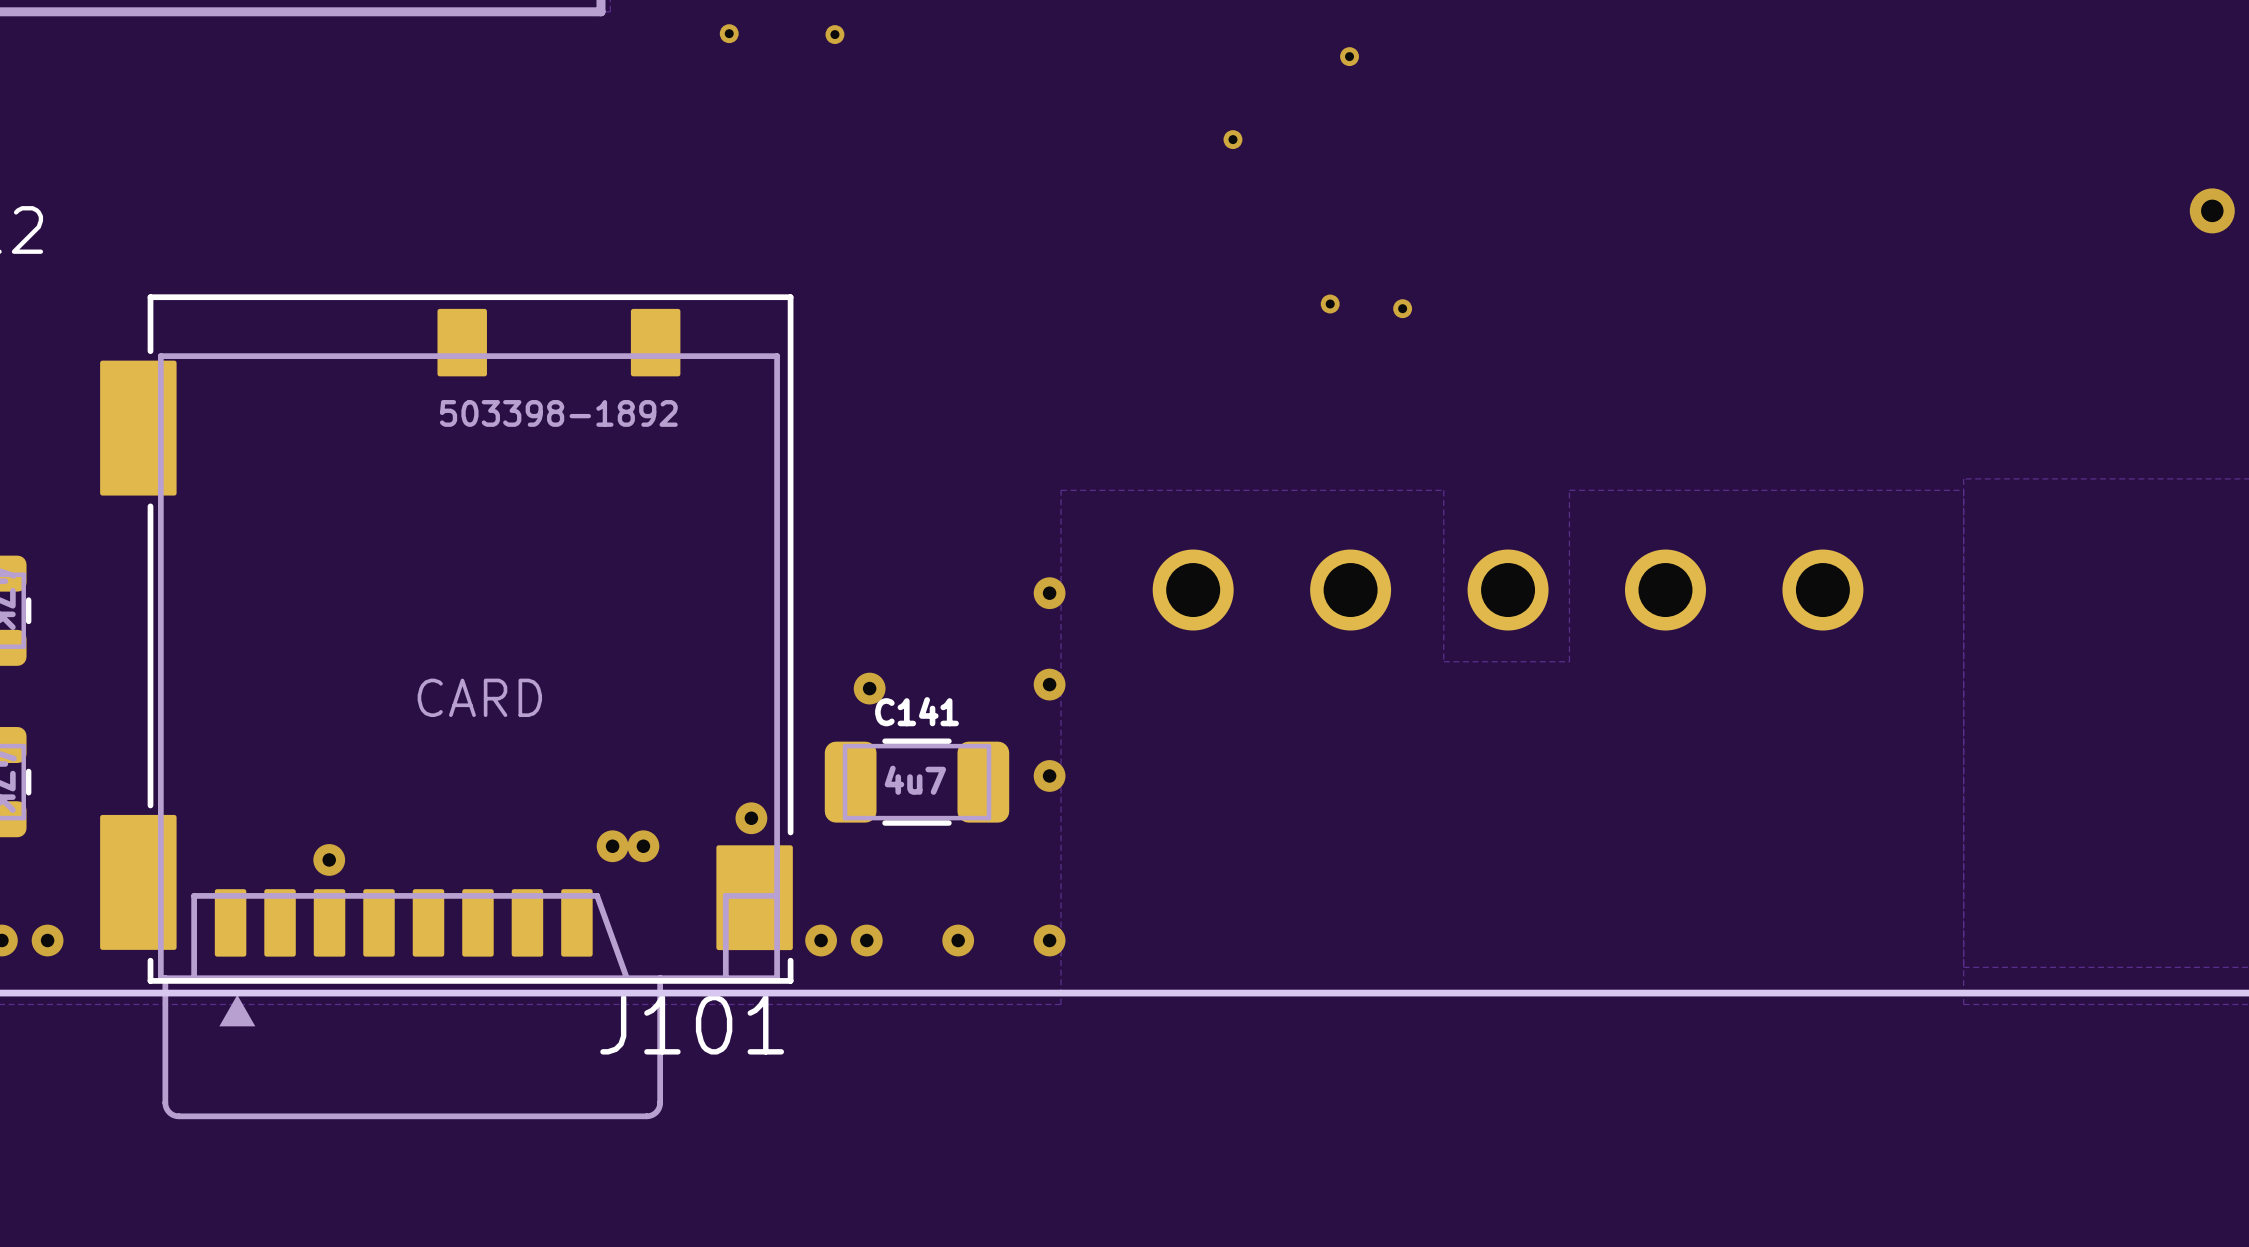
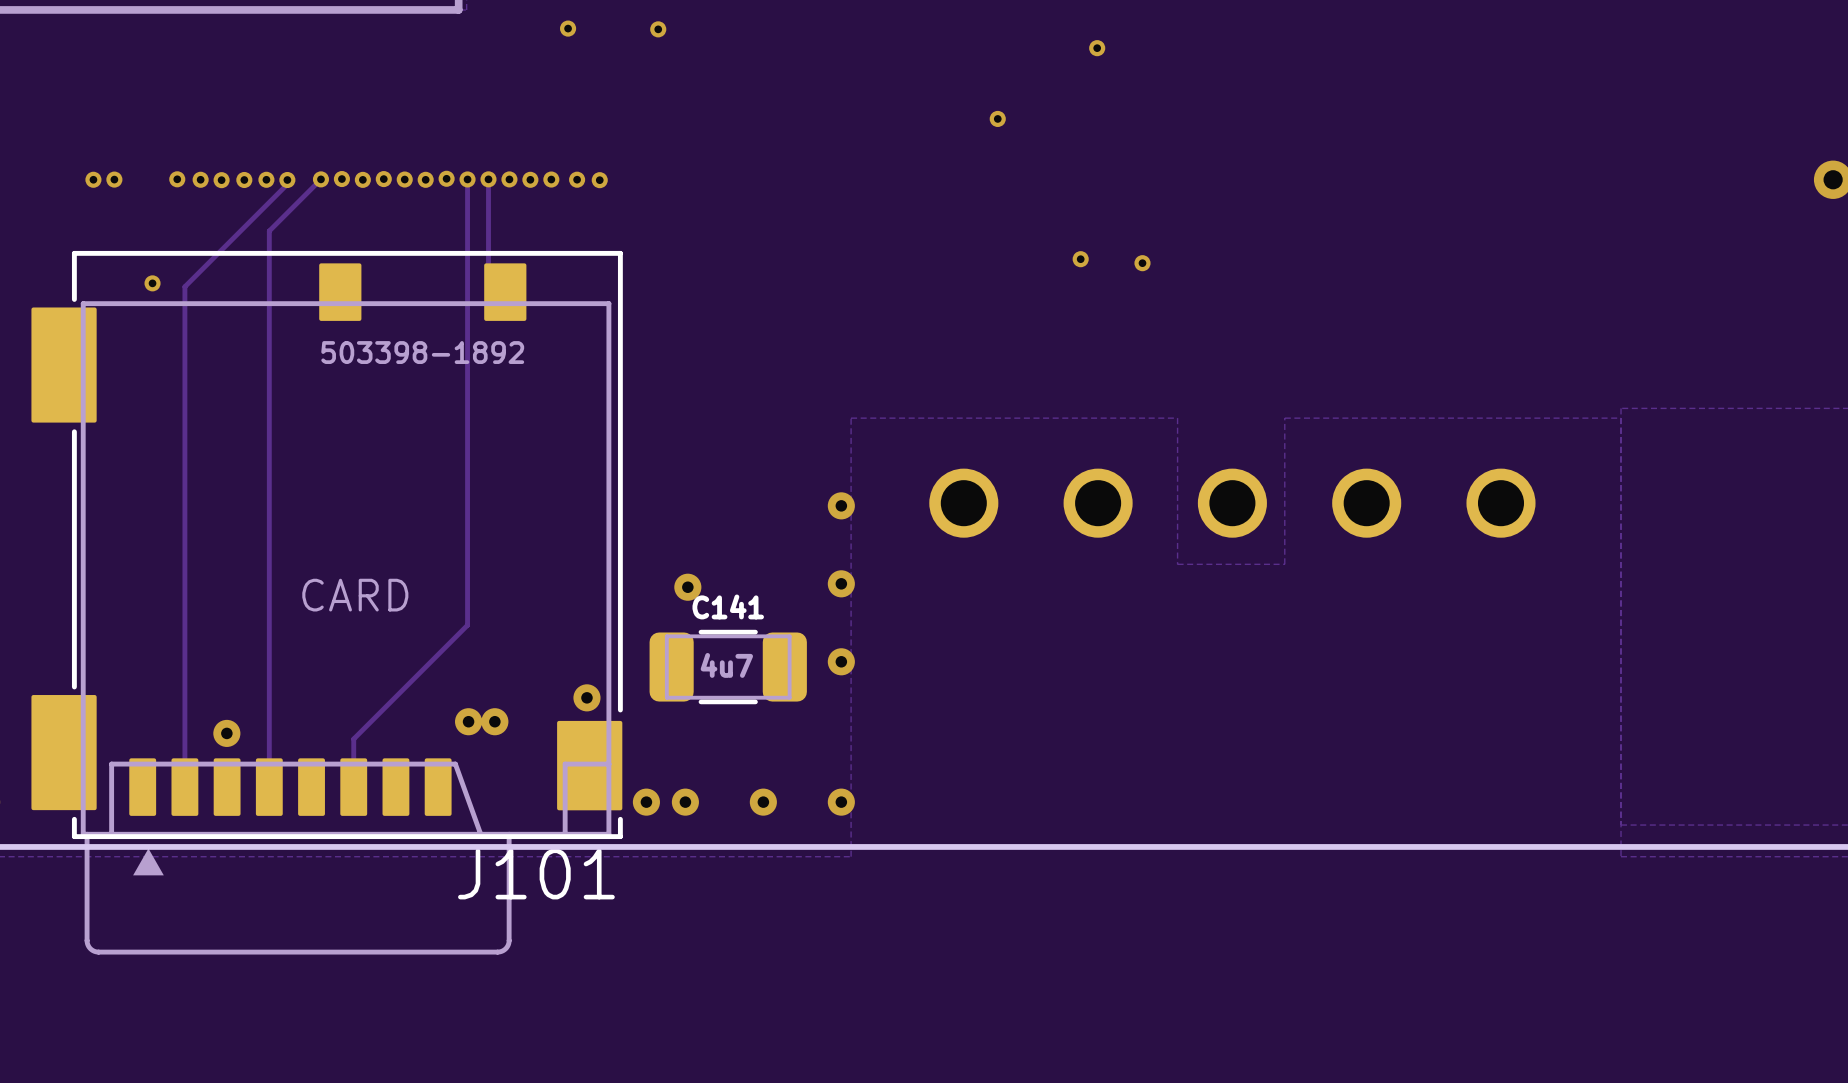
via: none -> (446, 178)
via: none -> (93, 179)
via: none -> (114, 179)
via: none -> (177, 179)
via: none -> (200, 179)
via: none -> (266, 179)
track: none -> (320, 179) (269, 231) (269, 787)
via: none -> (320, 179)
via: none -> (341, 179)
via: none -> (383, 179)
via: none -> (404, 179)
via: none -> (425, 179)
track: none -> (467, 179) (467, 625) (353, 739) (353, 787)
via: none -> (467, 179)
track: none -> (488, 179) (488, 275) (505, 292)
via: none -> (488, 179)
via: none -> (509, 179)
via: none -> (530, 179)
via: none -> (551, 179)
via: none -> (577, 179)
via: none -> (221, 180)
via: none -> (244, 179)
track: none -> (287, 180) (287, 184) (184, 286) (184, 787)
via: none -> (287, 180)
via: none -> (362, 179)
via: none -> (599, 180)
via: none -> (152, 283)

